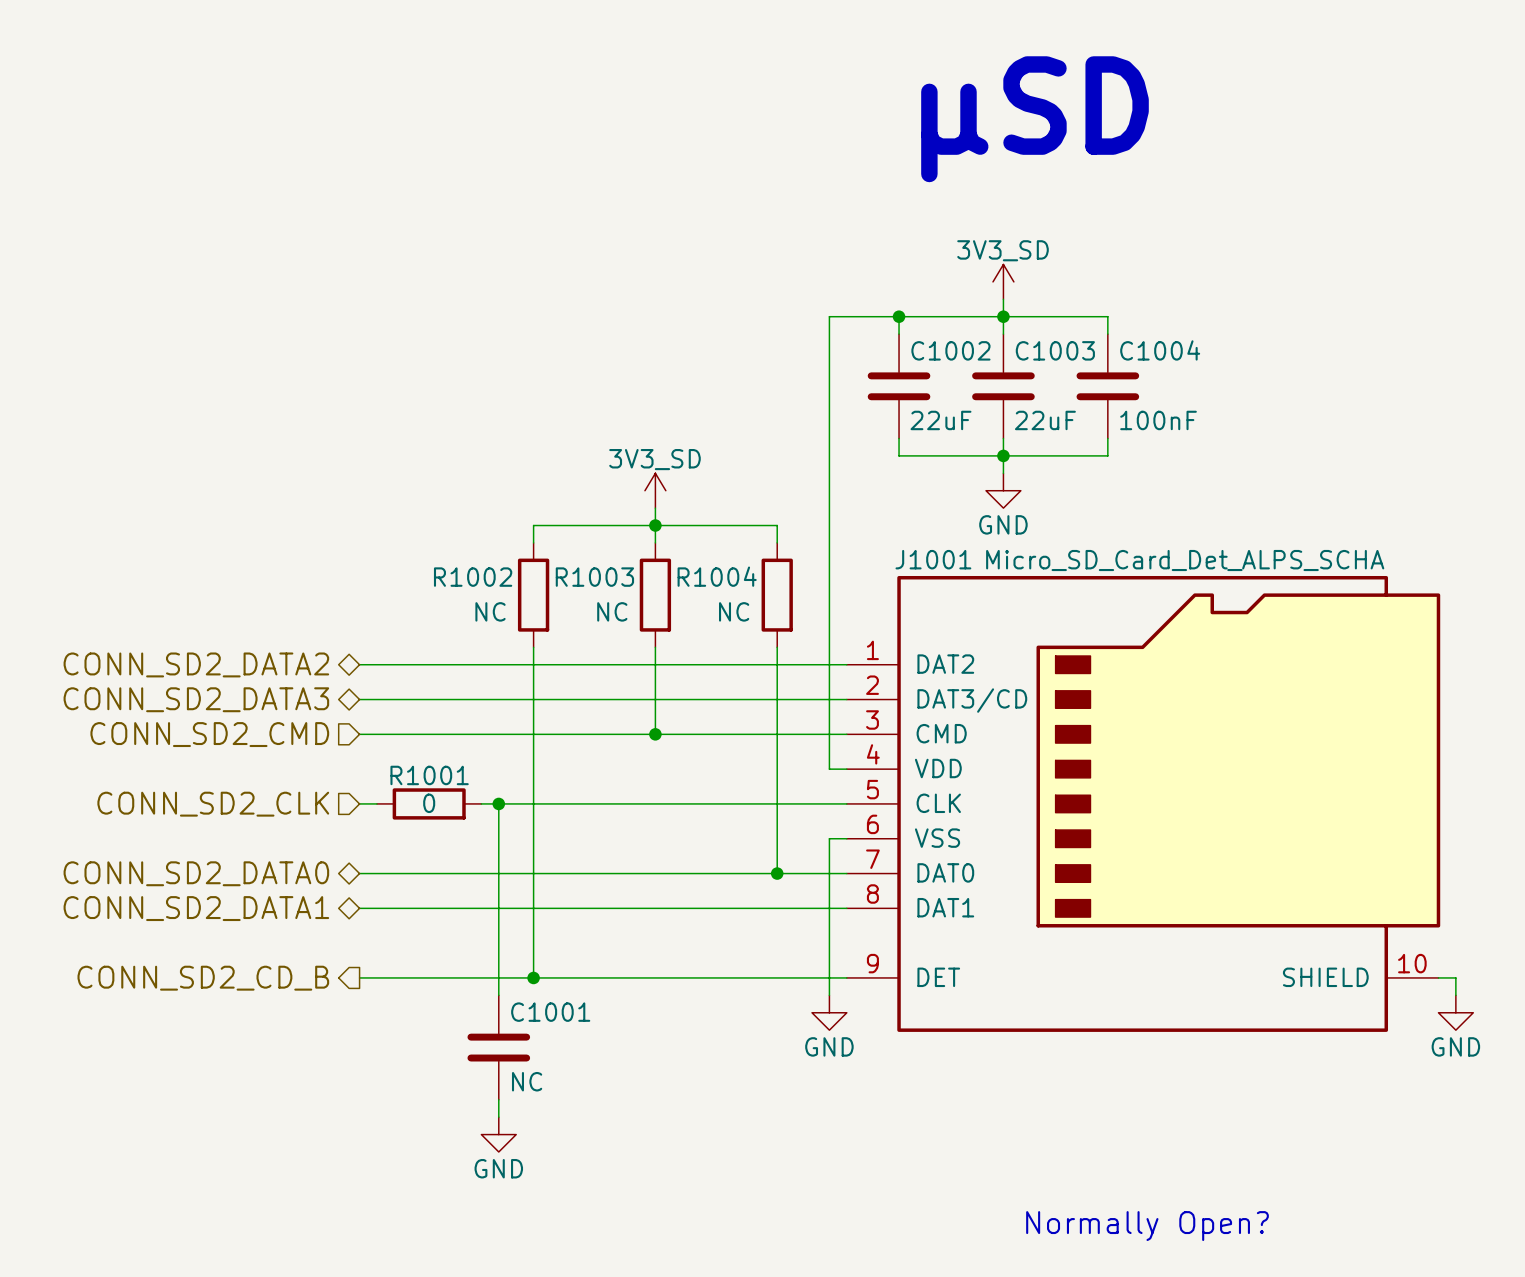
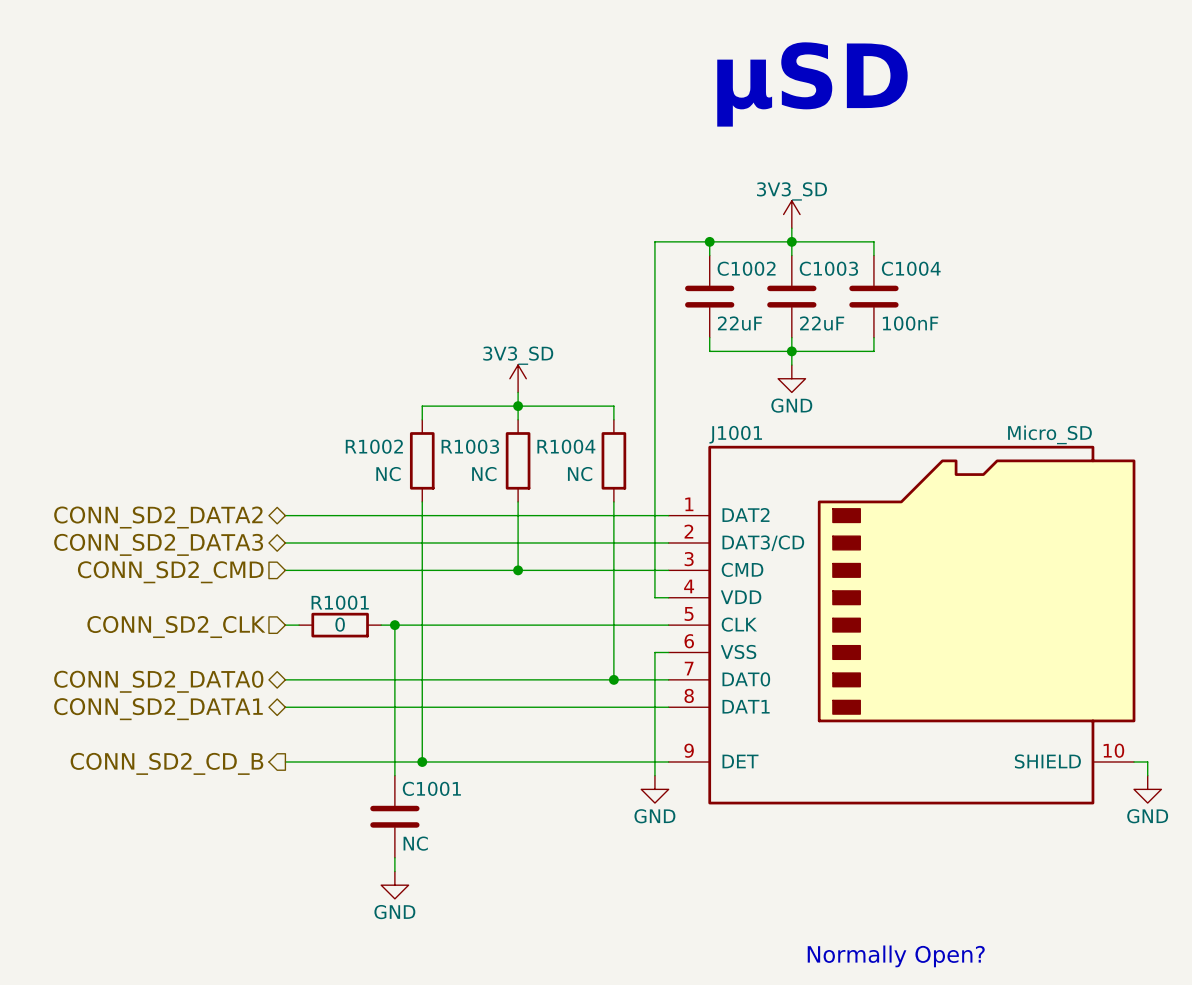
J1001 value: Micro_SD_Card_Det_ALPS_SCHA (1185, 560) -> Micro_SD (1049, 434)

